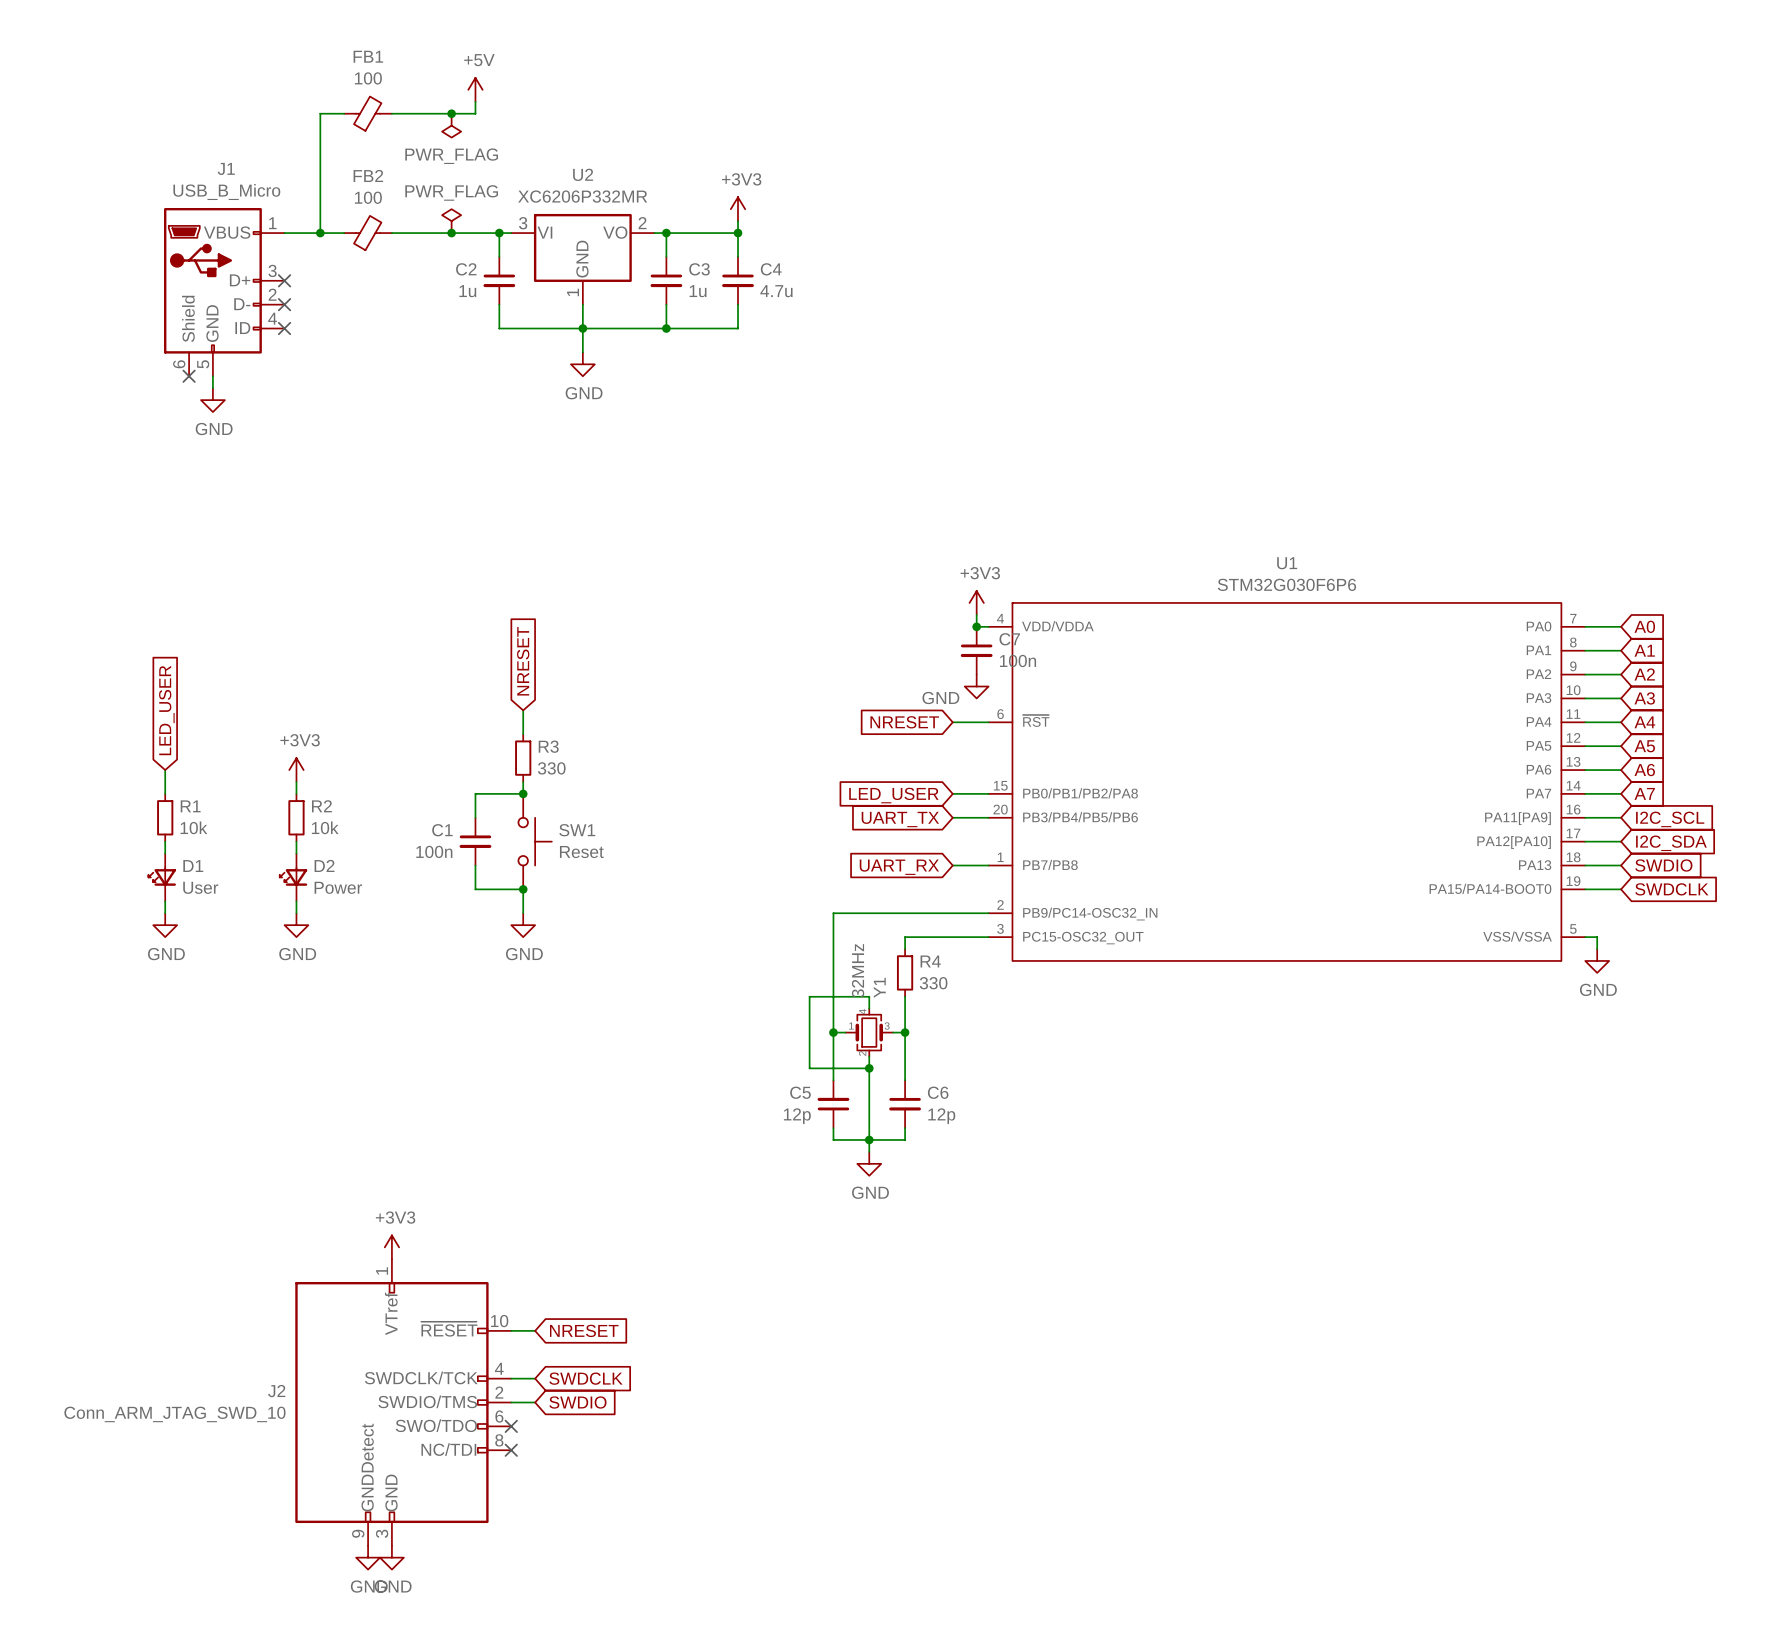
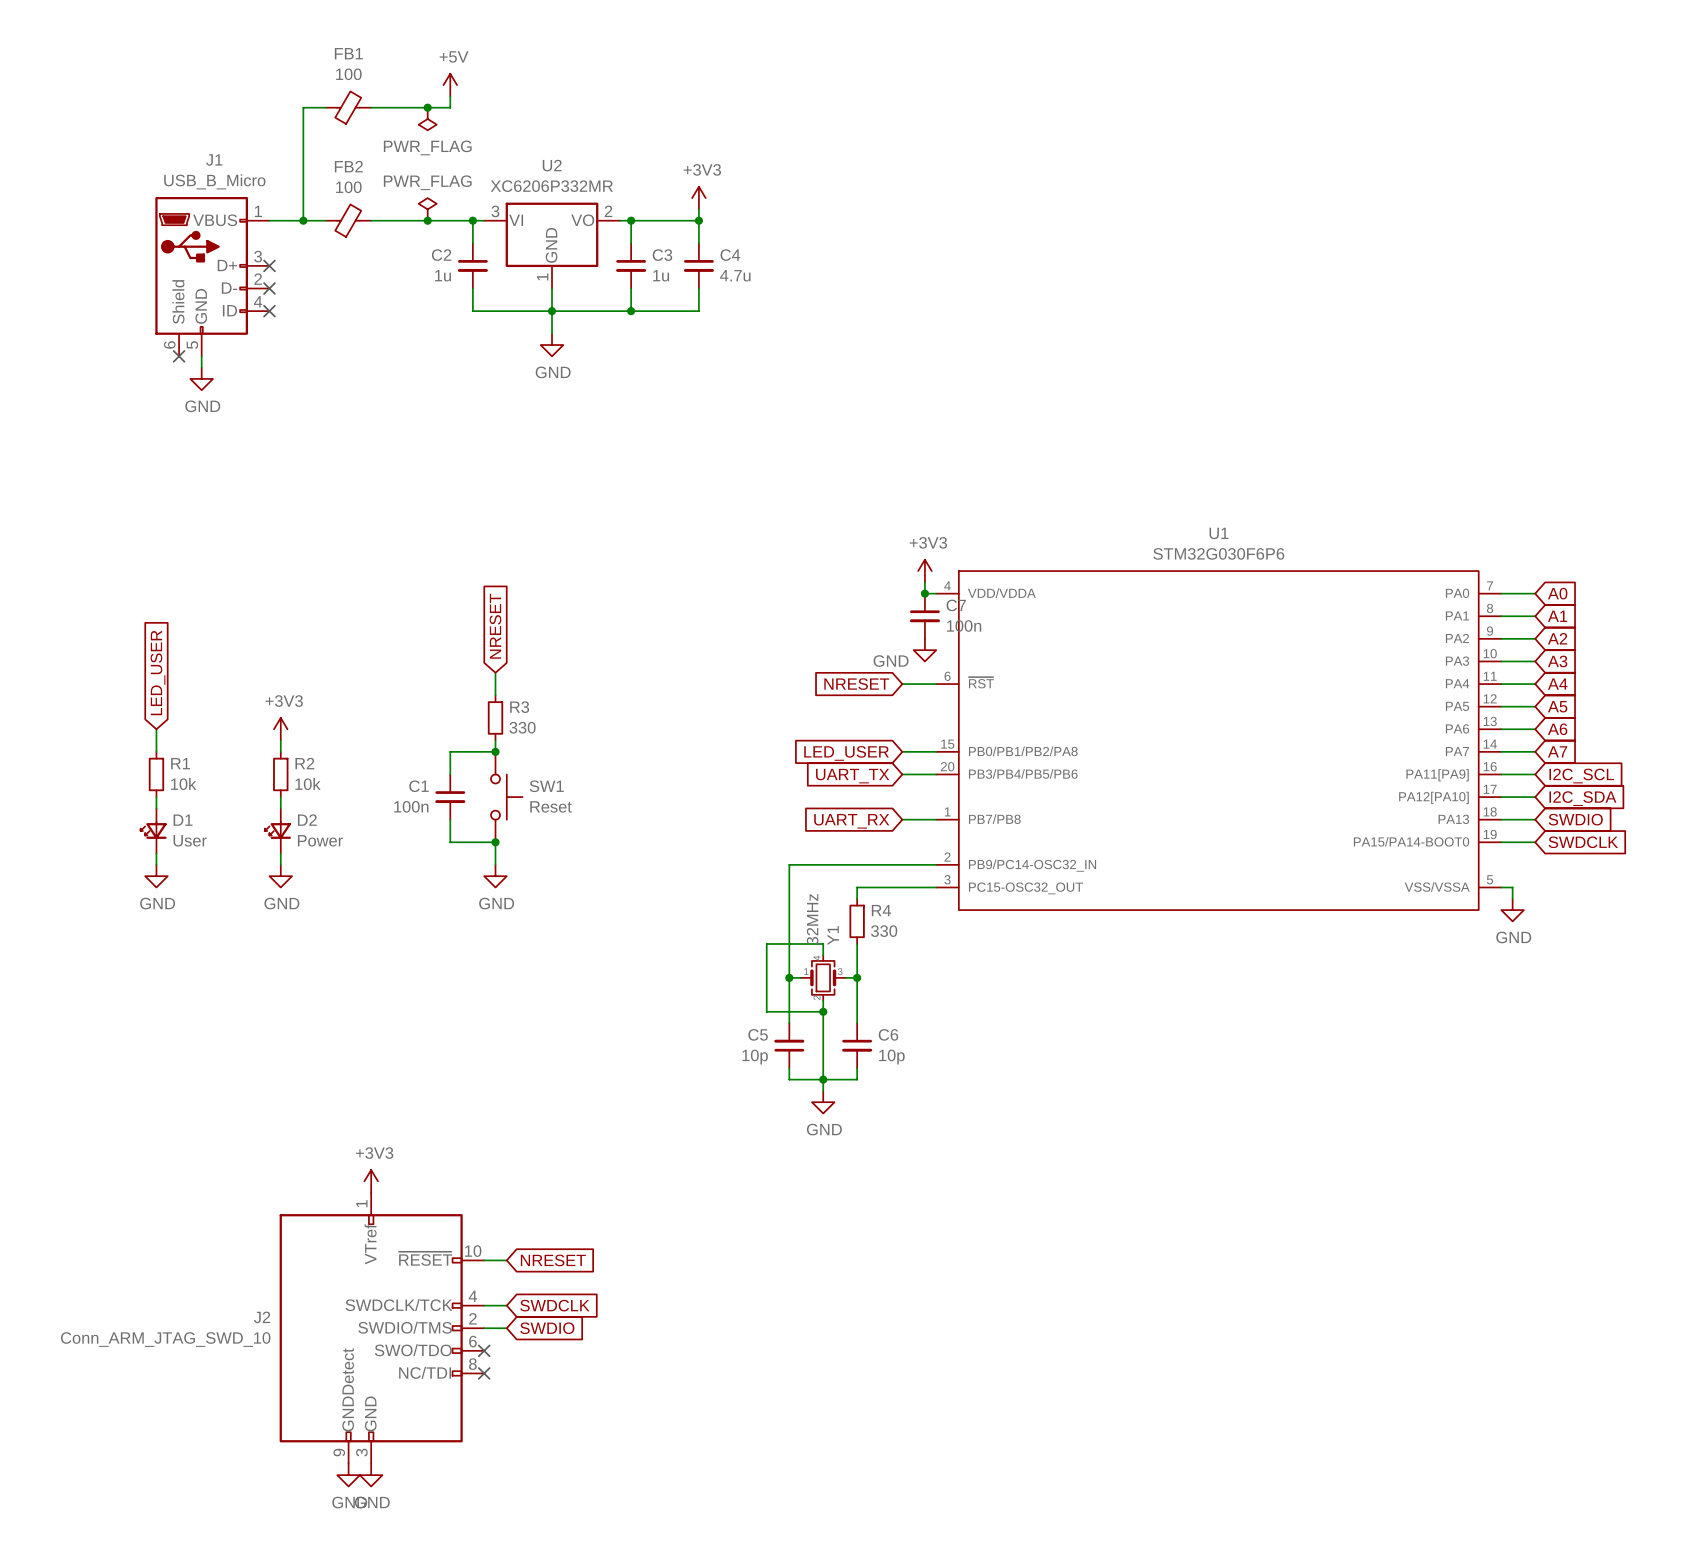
C5 value: 12p (797, 1116) -> 10p (755, 1057)
C6 value: 12p (941, 1116) -> 10p (891, 1057)

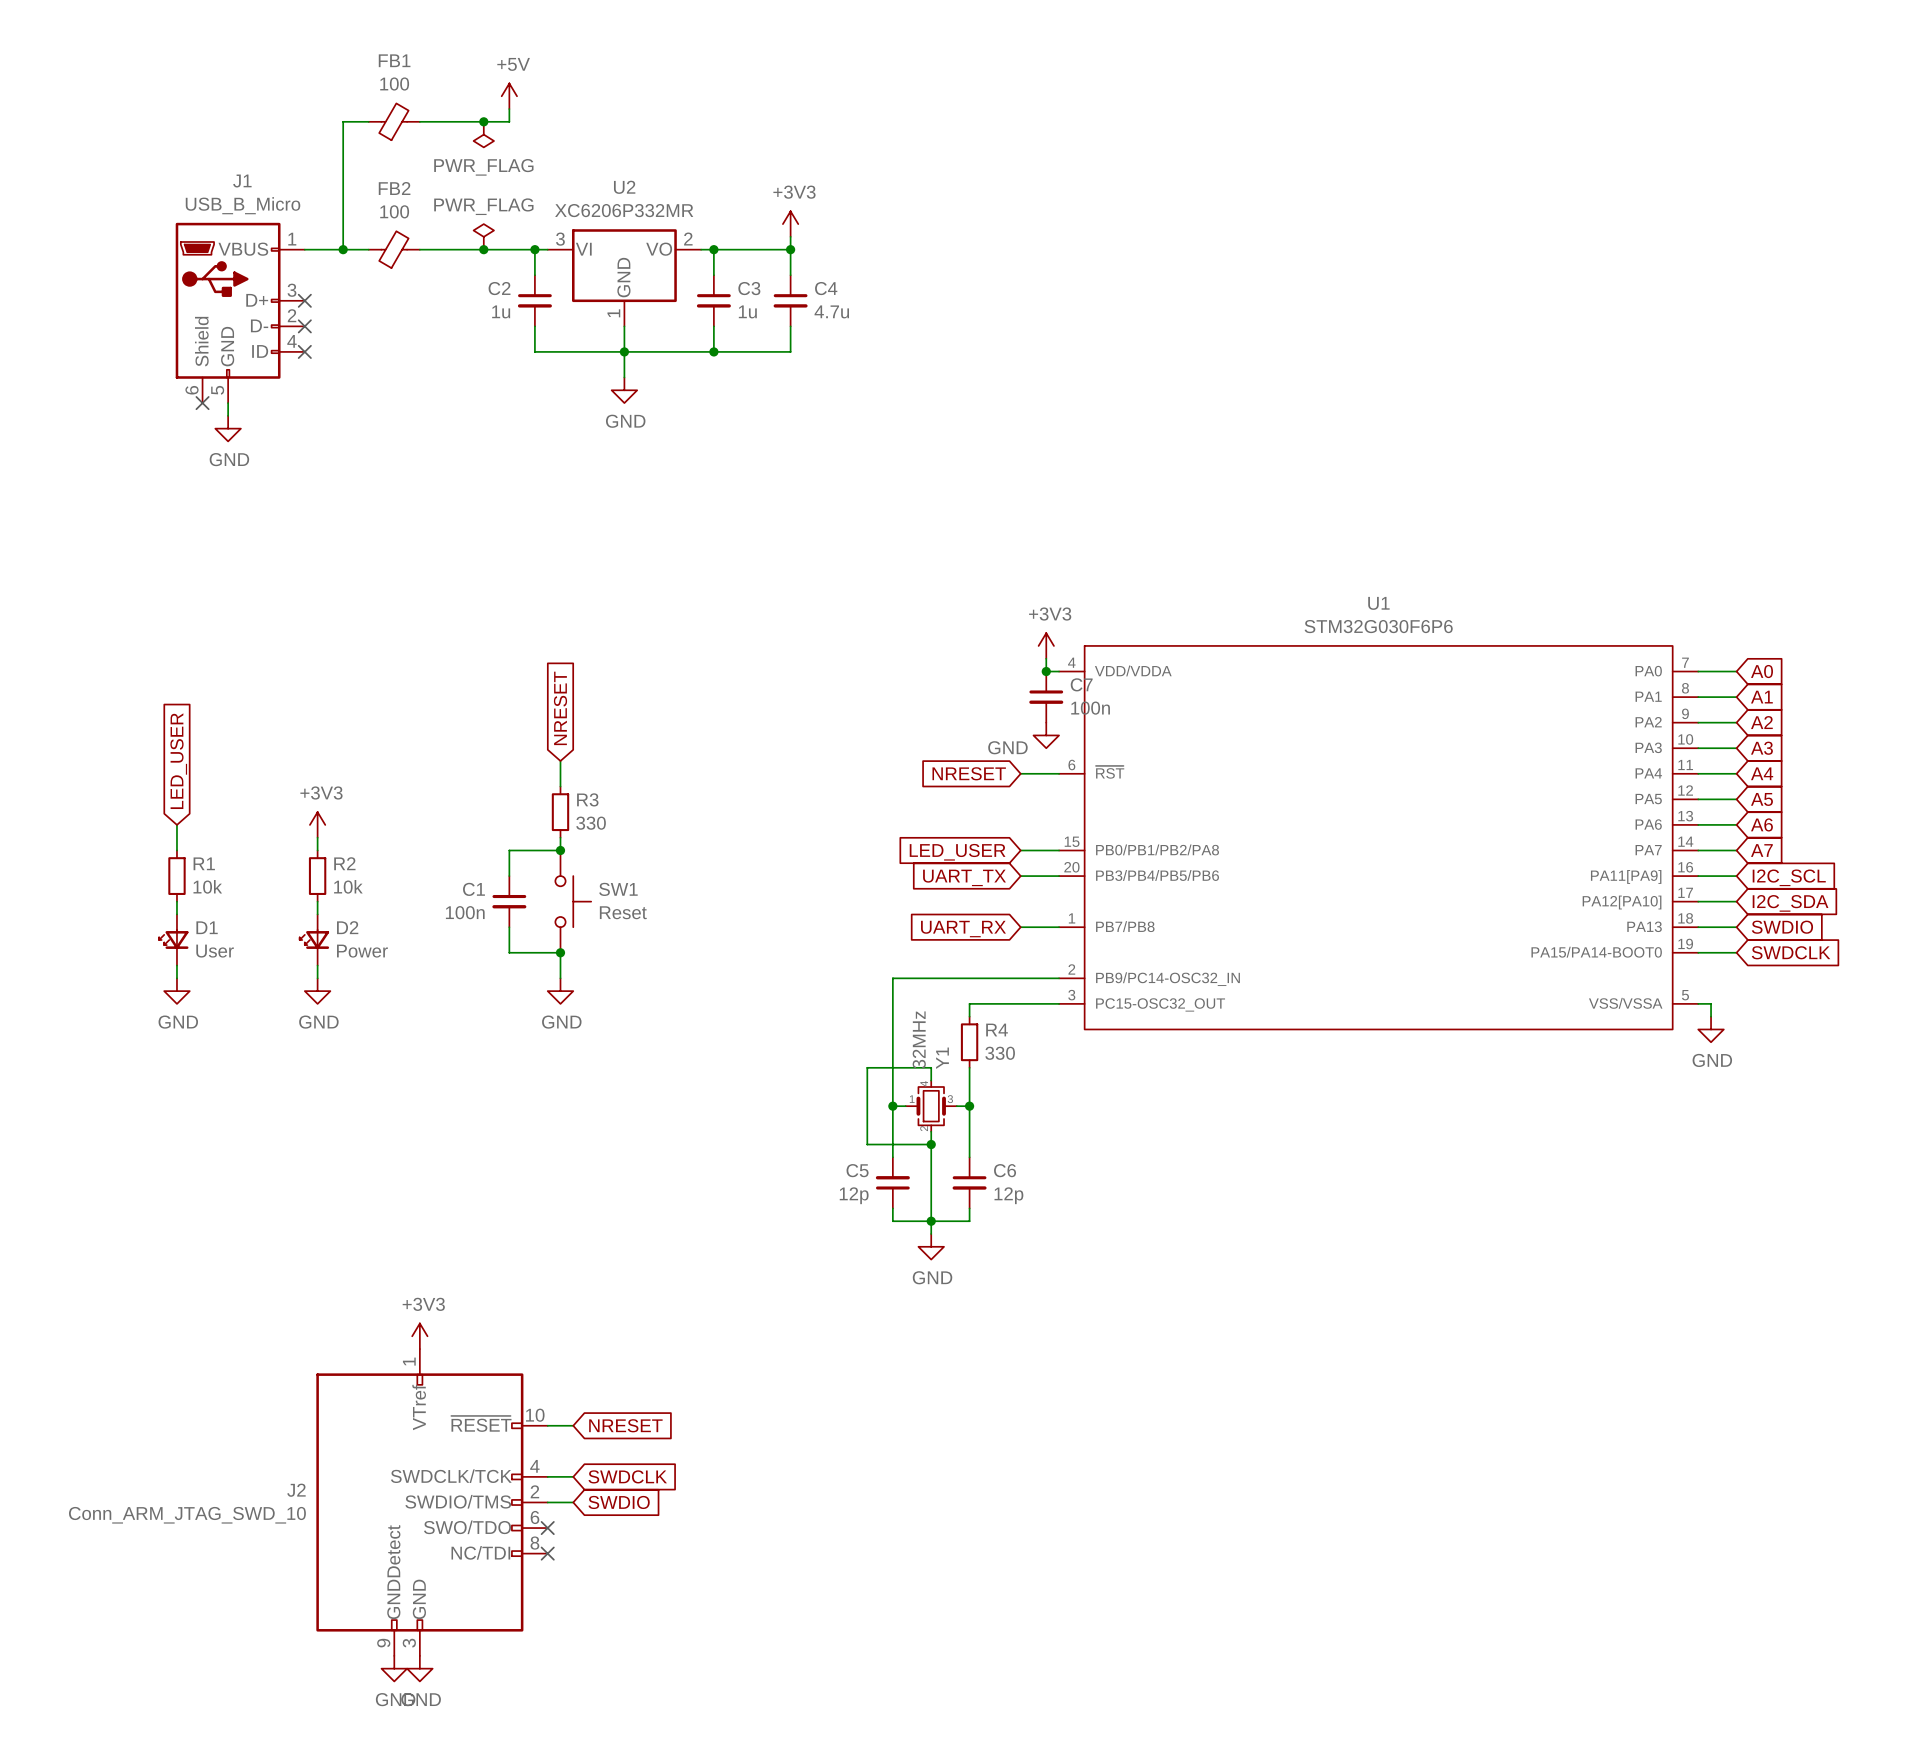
C5 value: 10p (755, 1057) -> 12p (854, 1195)
C6 value: 10p (891, 1057) -> 12p (1008, 1195)

